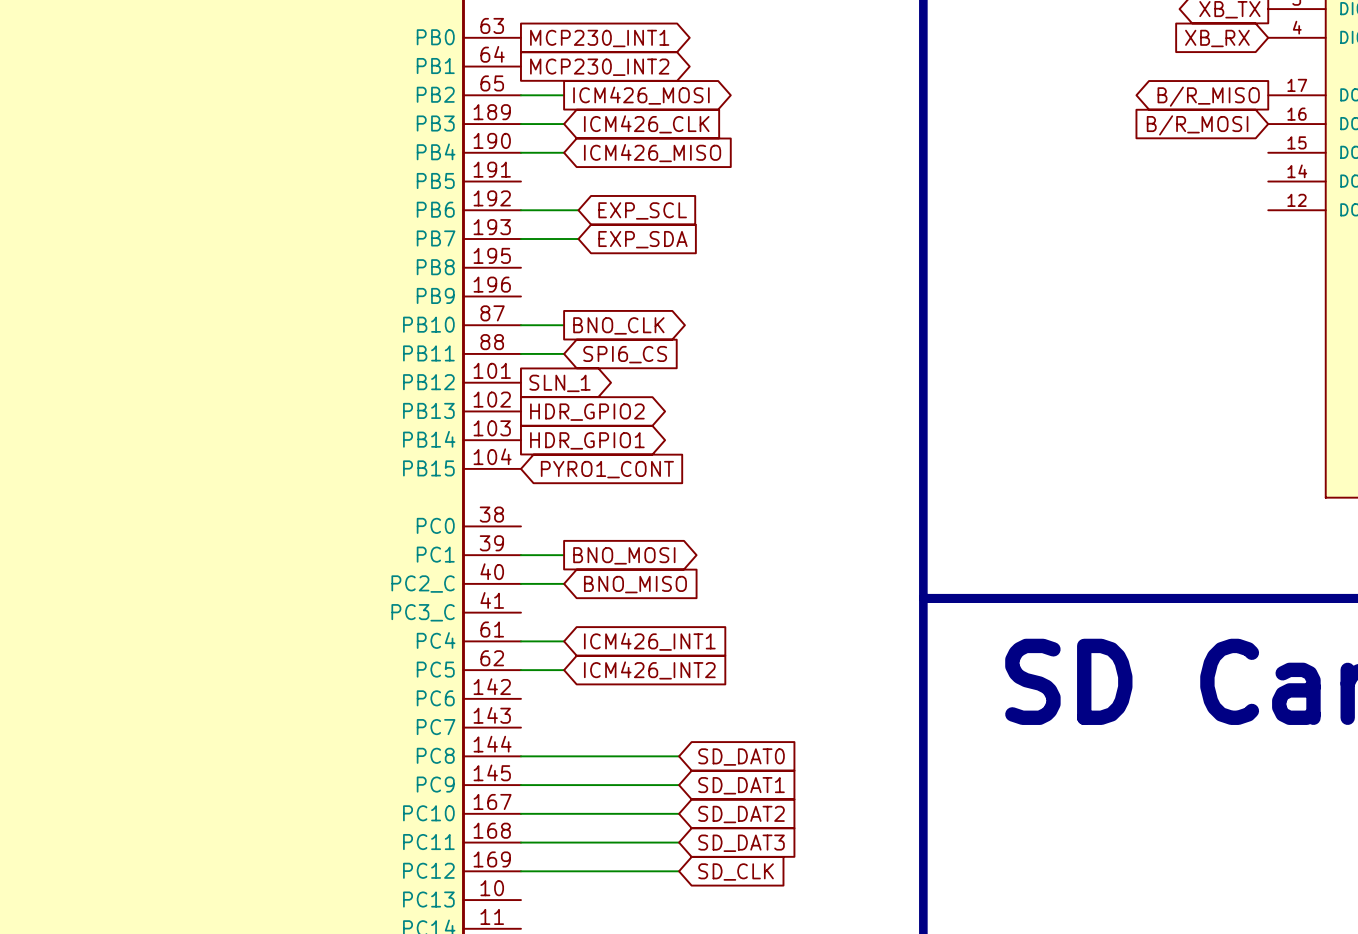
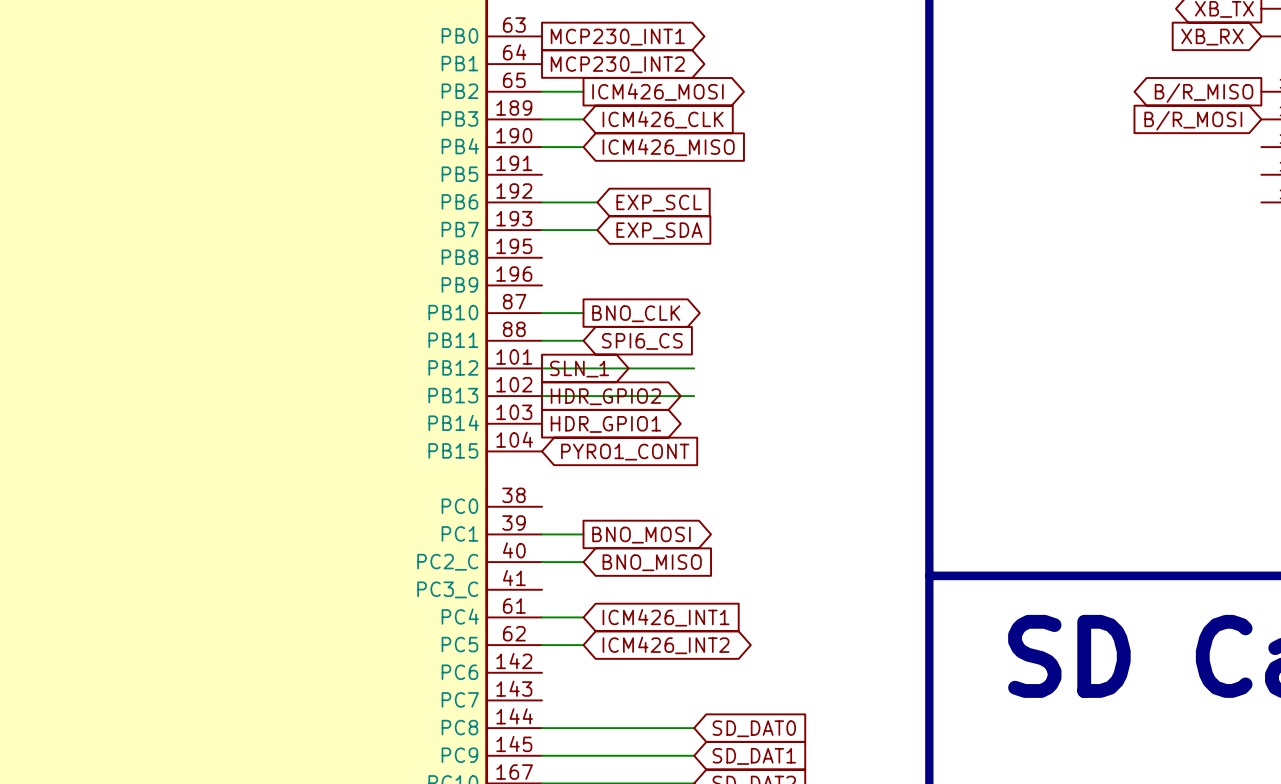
wire: none -> (541, 368) (694, 368)
wire: none -> (541, 396) (694, 396)
global label shape: input (649, 670) -> bidirectional (666, 645)

